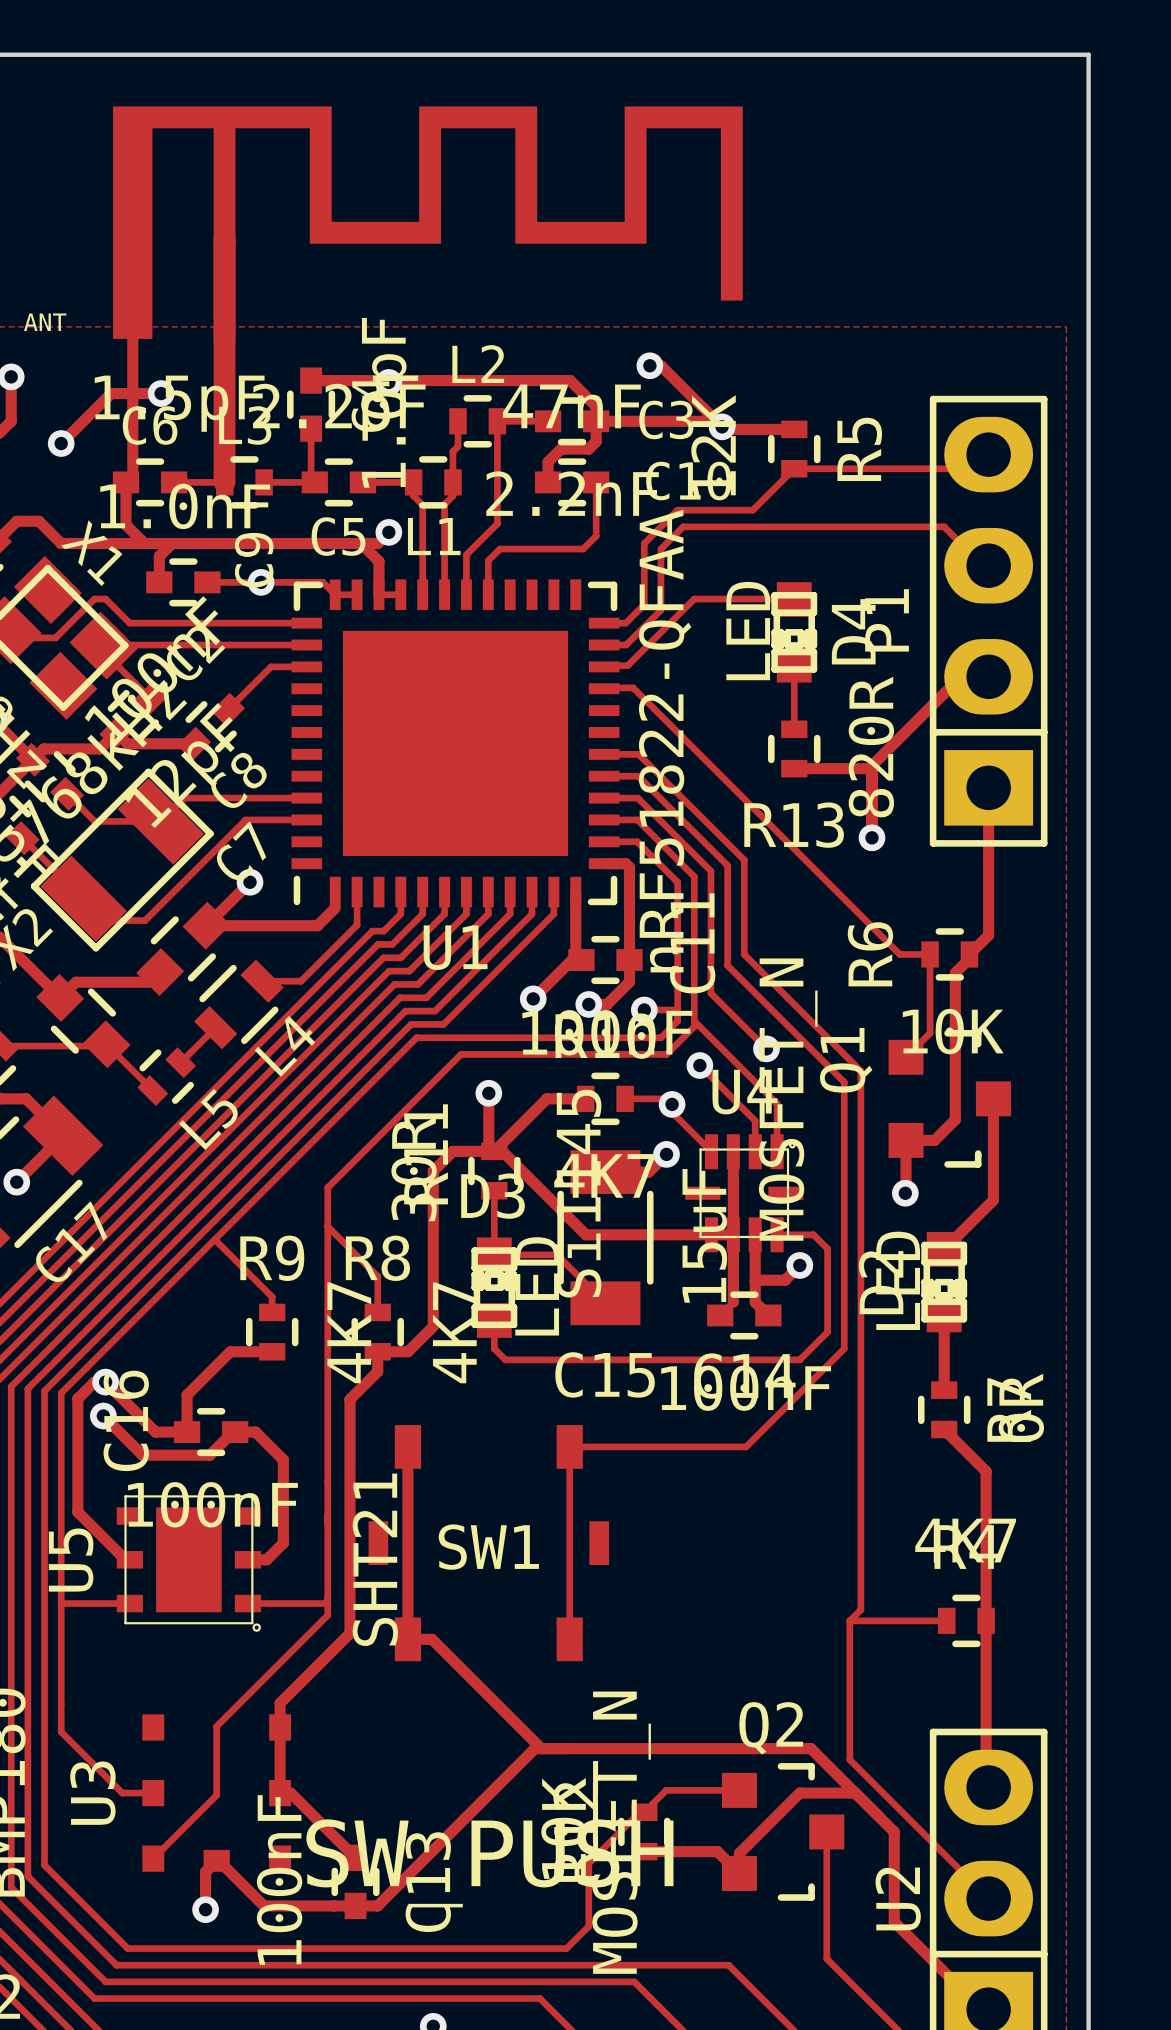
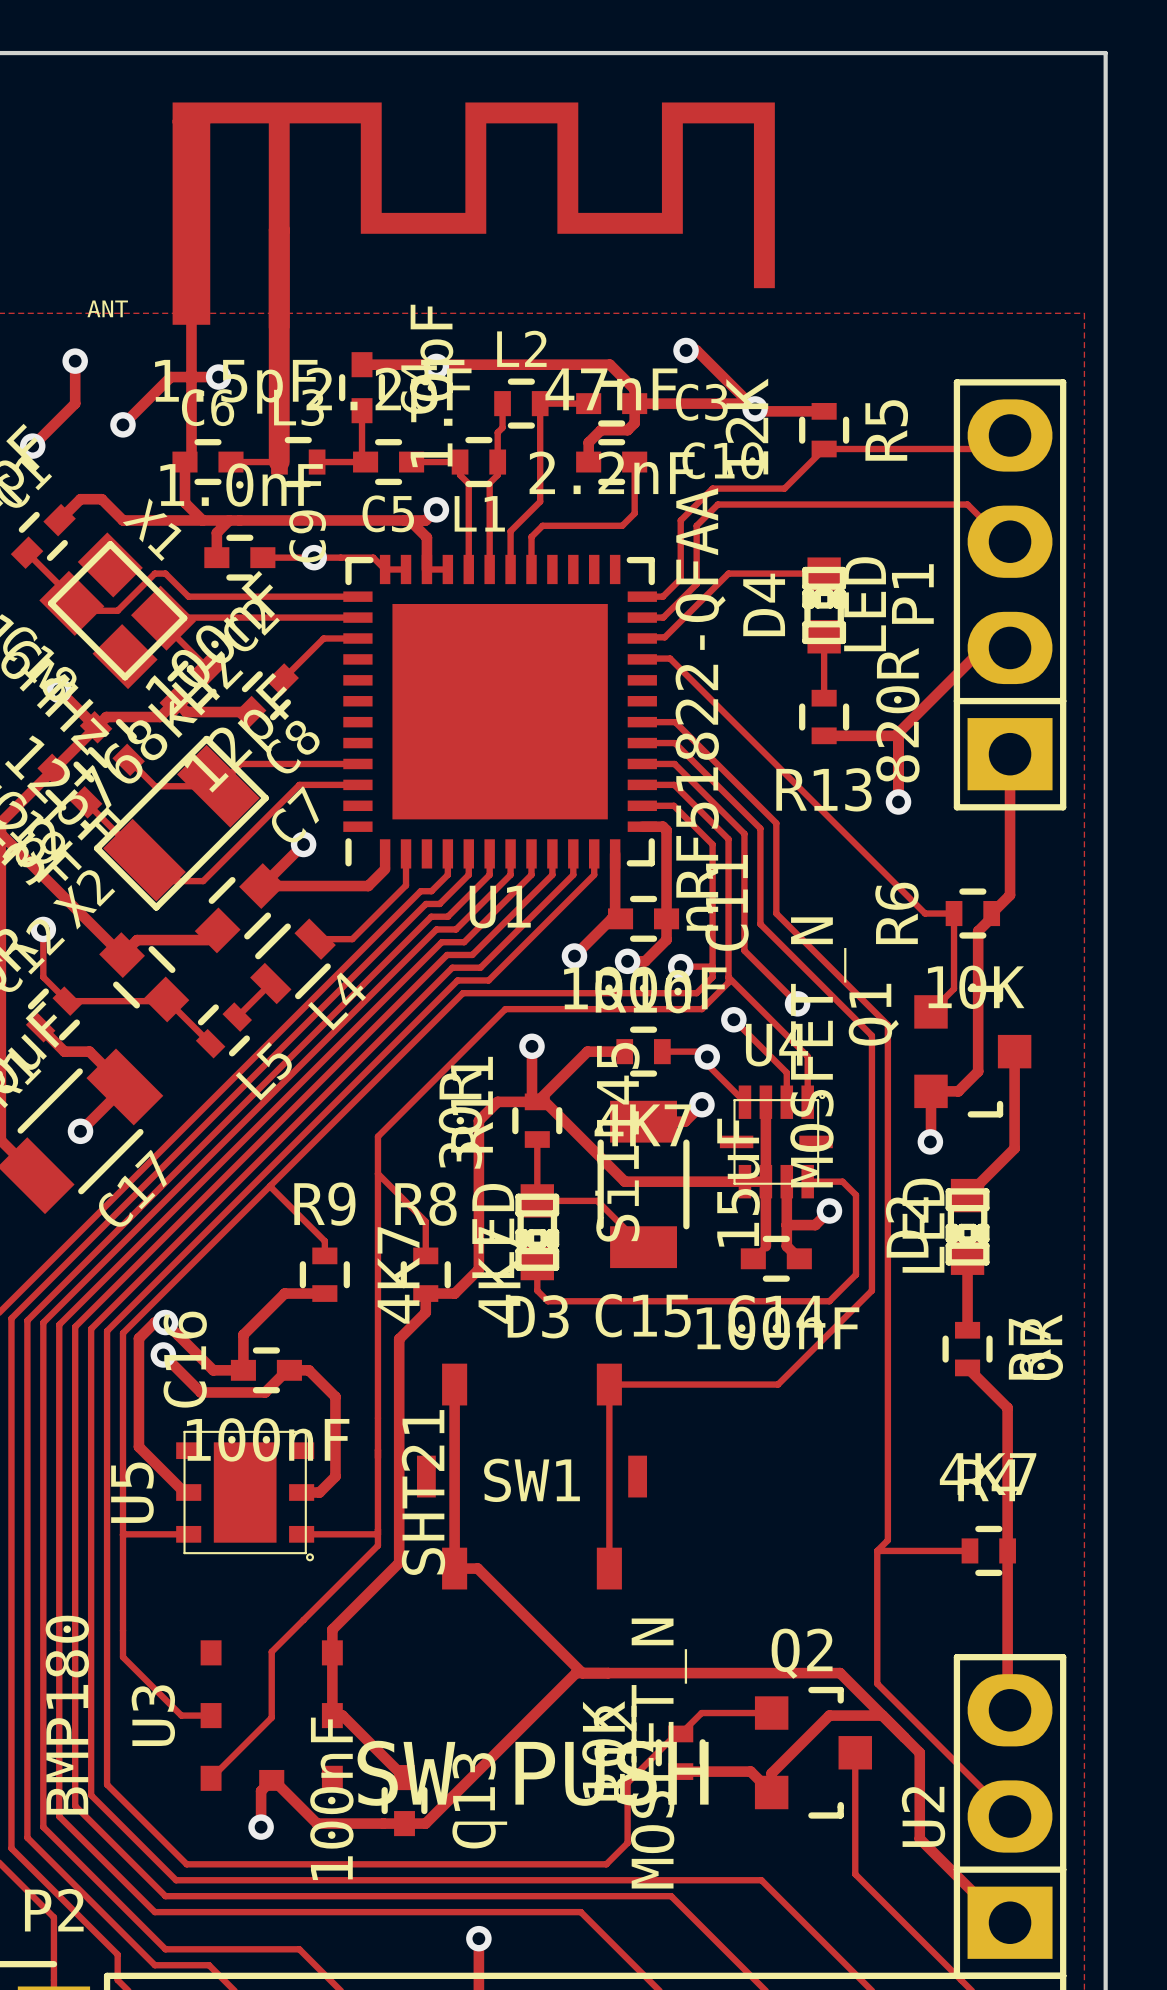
D4 rotation: 0° (794, 632) -> 180° (824, 605)
D3 rotation: 0° (494, 1287) -> 180° (537, 1232)

